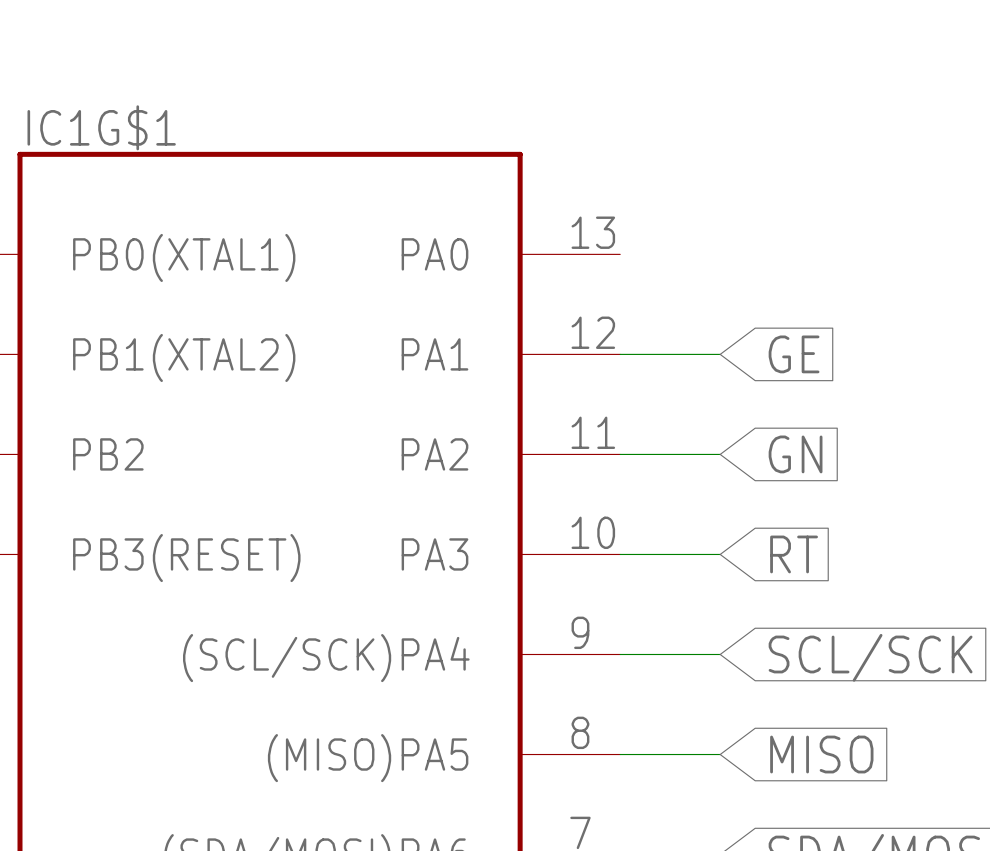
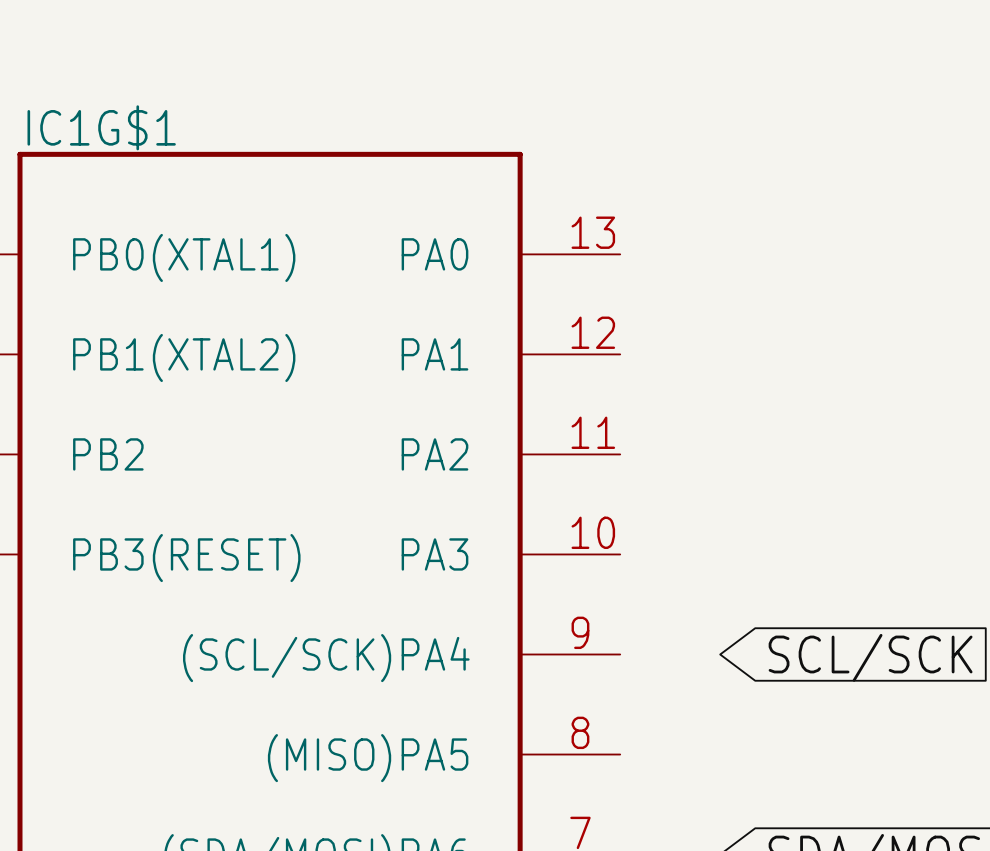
wire: (620, 354) (720, 354) -> none
global label: GE (794, 354) -> none
wire: (620, 454) (720, 454) -> none
global label: GN (795, 454) -> none
wire: (620, 554) (720, 554) -> none
global label: RT (794, 554) -> none
wire: (620, 654) (720, 654) -> none
wire: (620, 754) (720, 754) -> none
global label: MISO (821, 754) -> none

